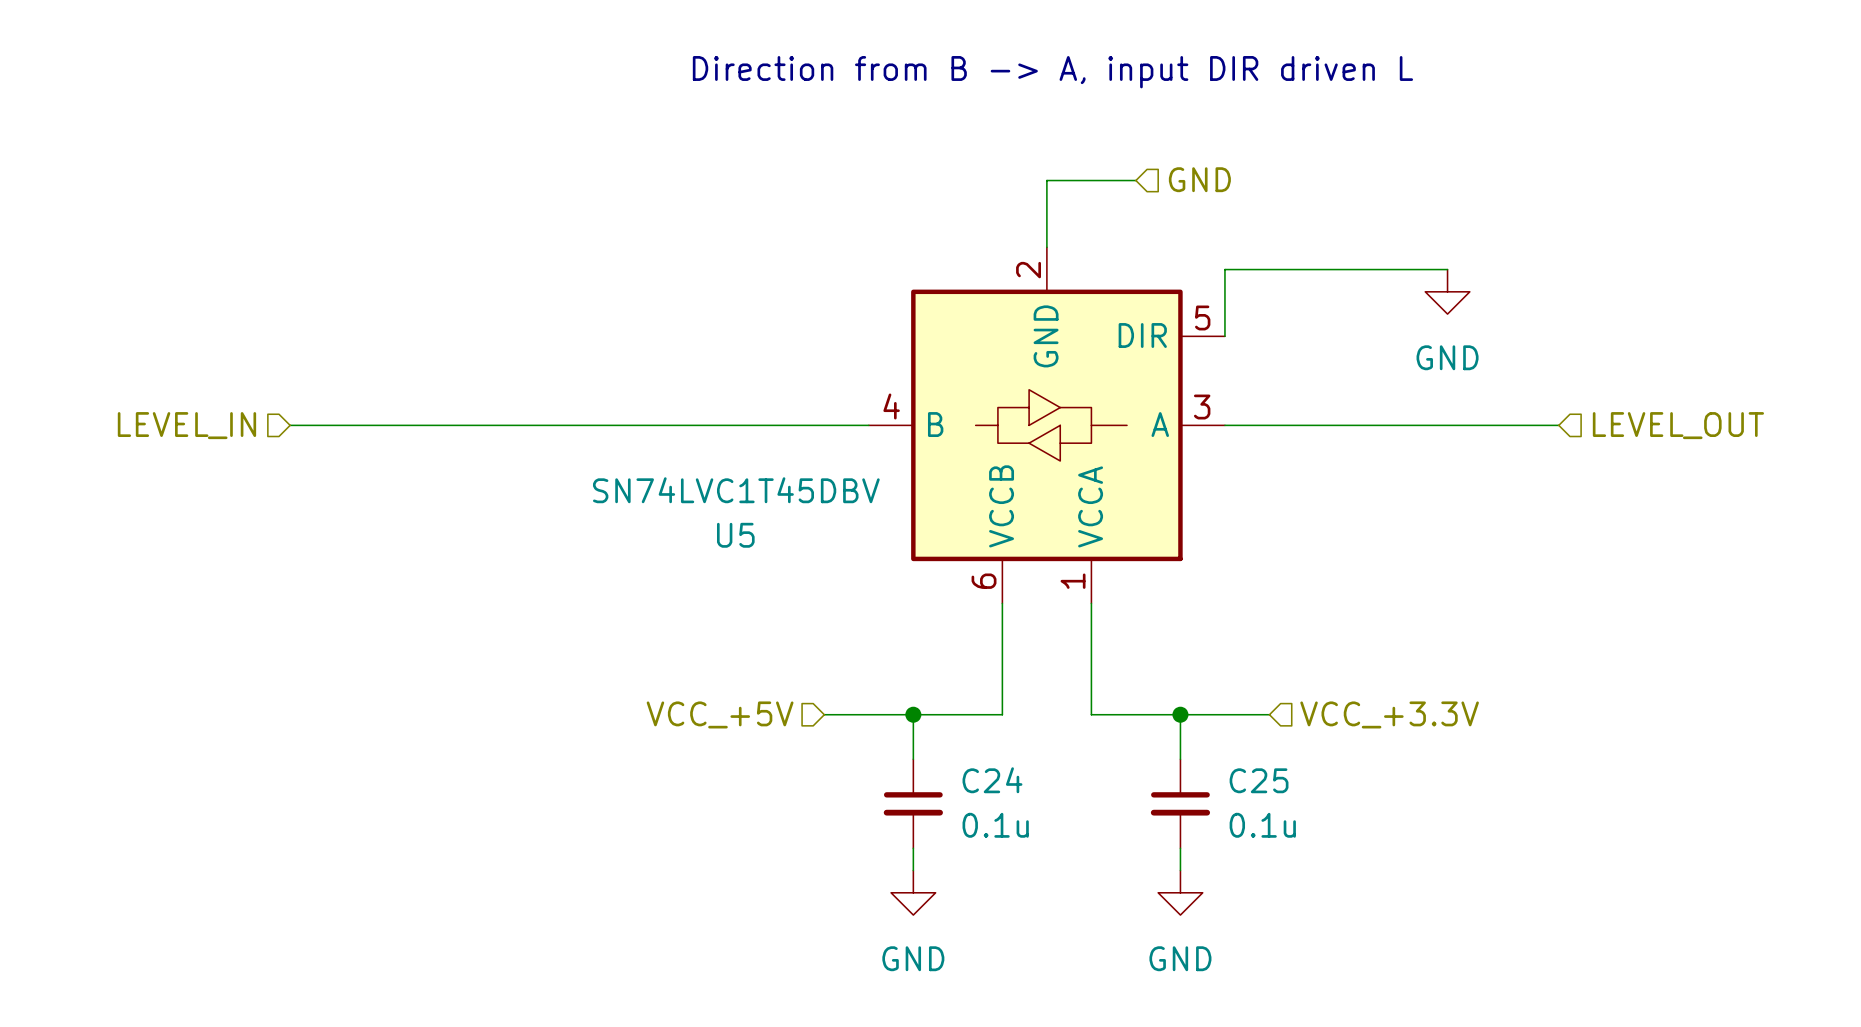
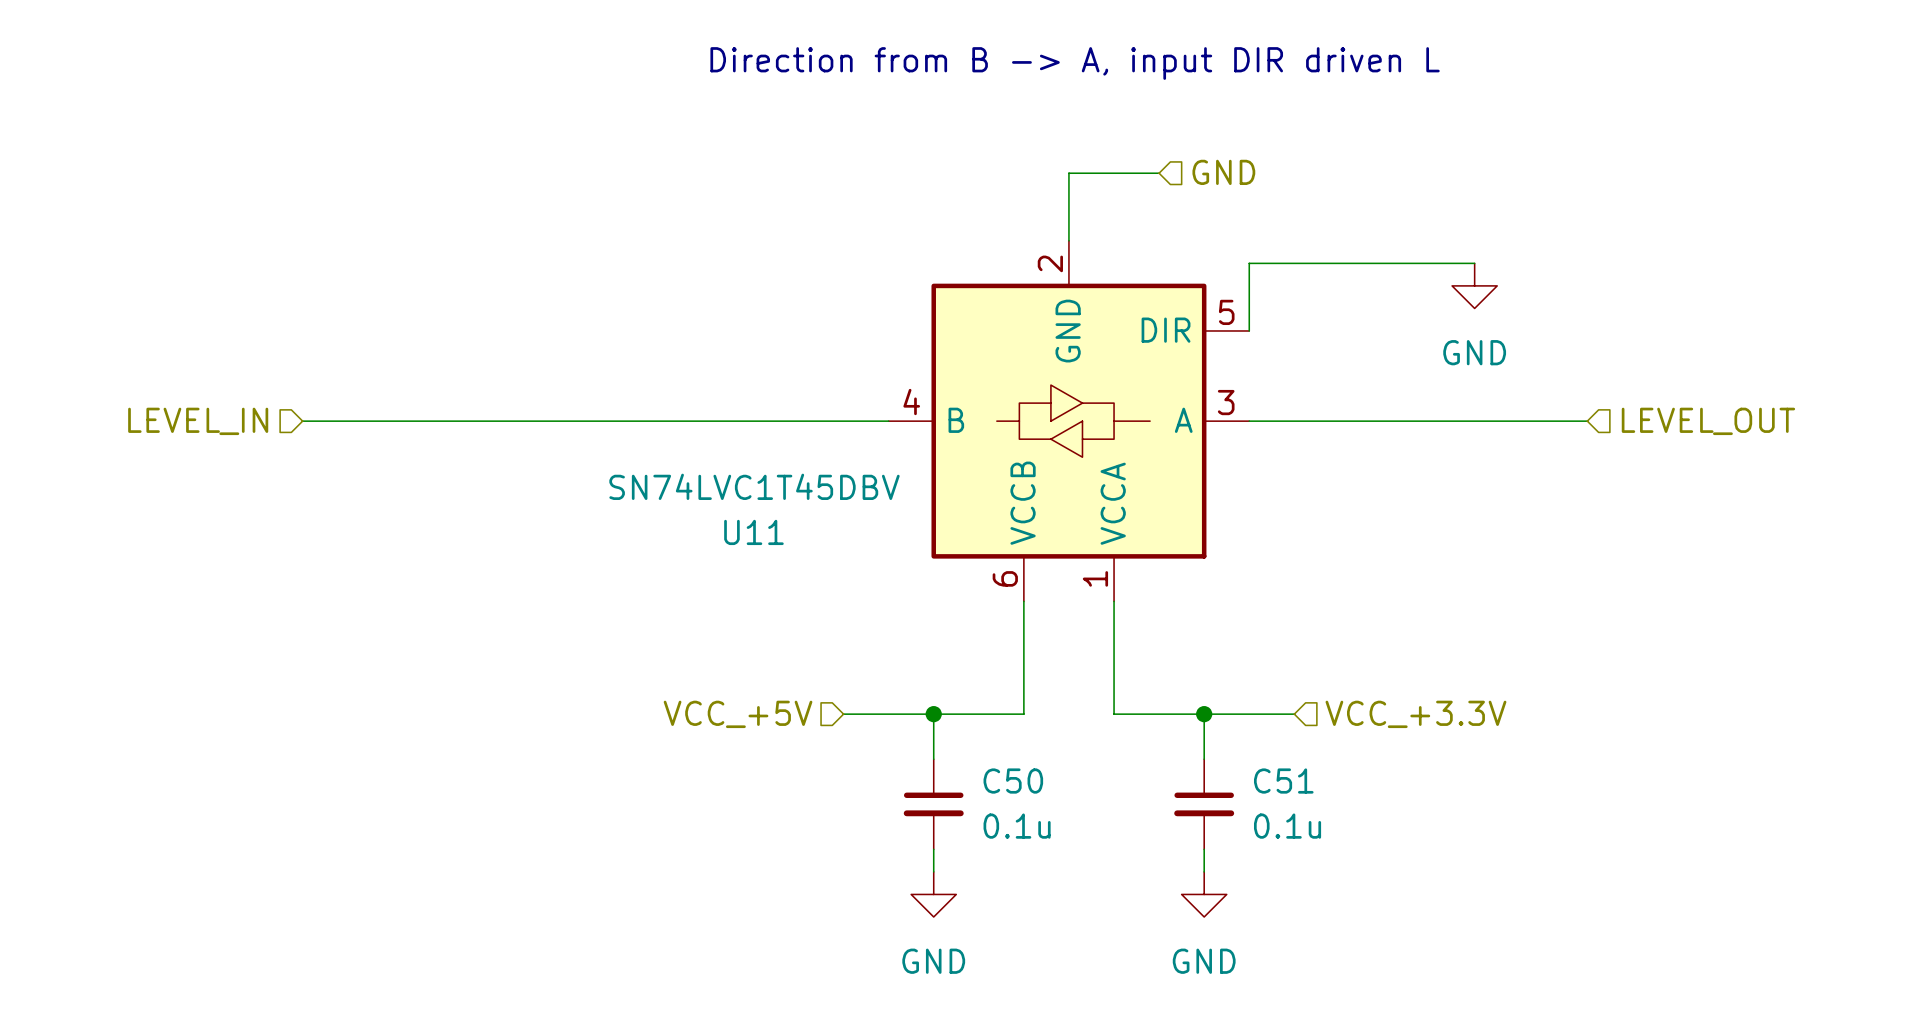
U5 name: U5 (735, 535) -> U11 (753, 532)
C24 name: C24 (992, 780) -> C50 (1013, 781)
C25 name: C25 (1259, 780) -> C51 (1283, 781)

